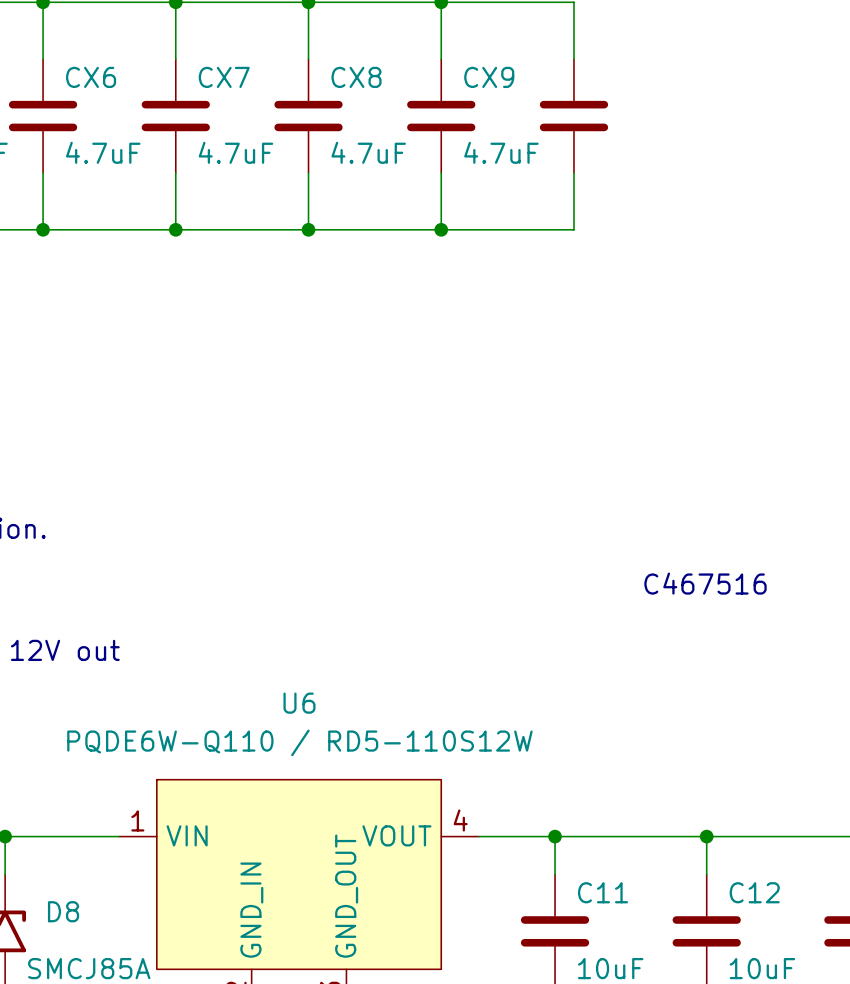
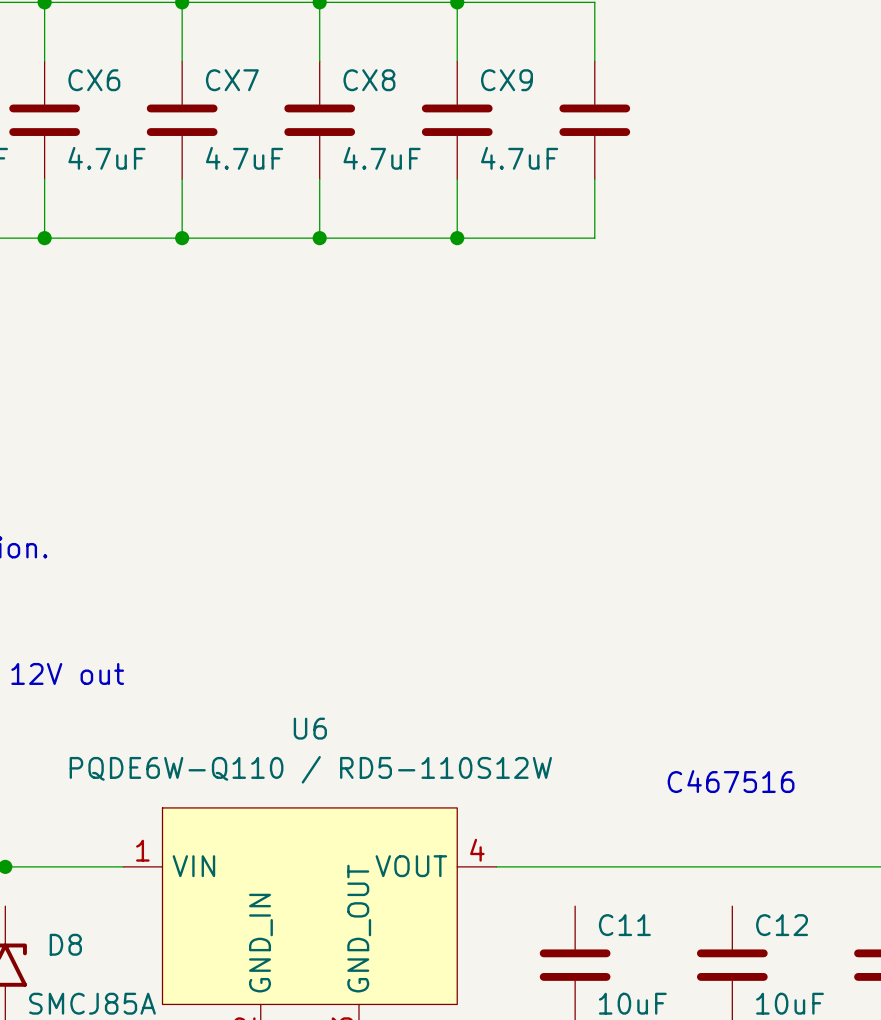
text position: C467516 (705, 583) -> C467516 (731, 781)
wire: (5, 836) (5, 874) -> none
wire: (555, 836) (555, 874) -> none
junction: (555, 836) -> none
wire: (706, 836) (706, 874) -> none
junction: (706, 836) -> none

